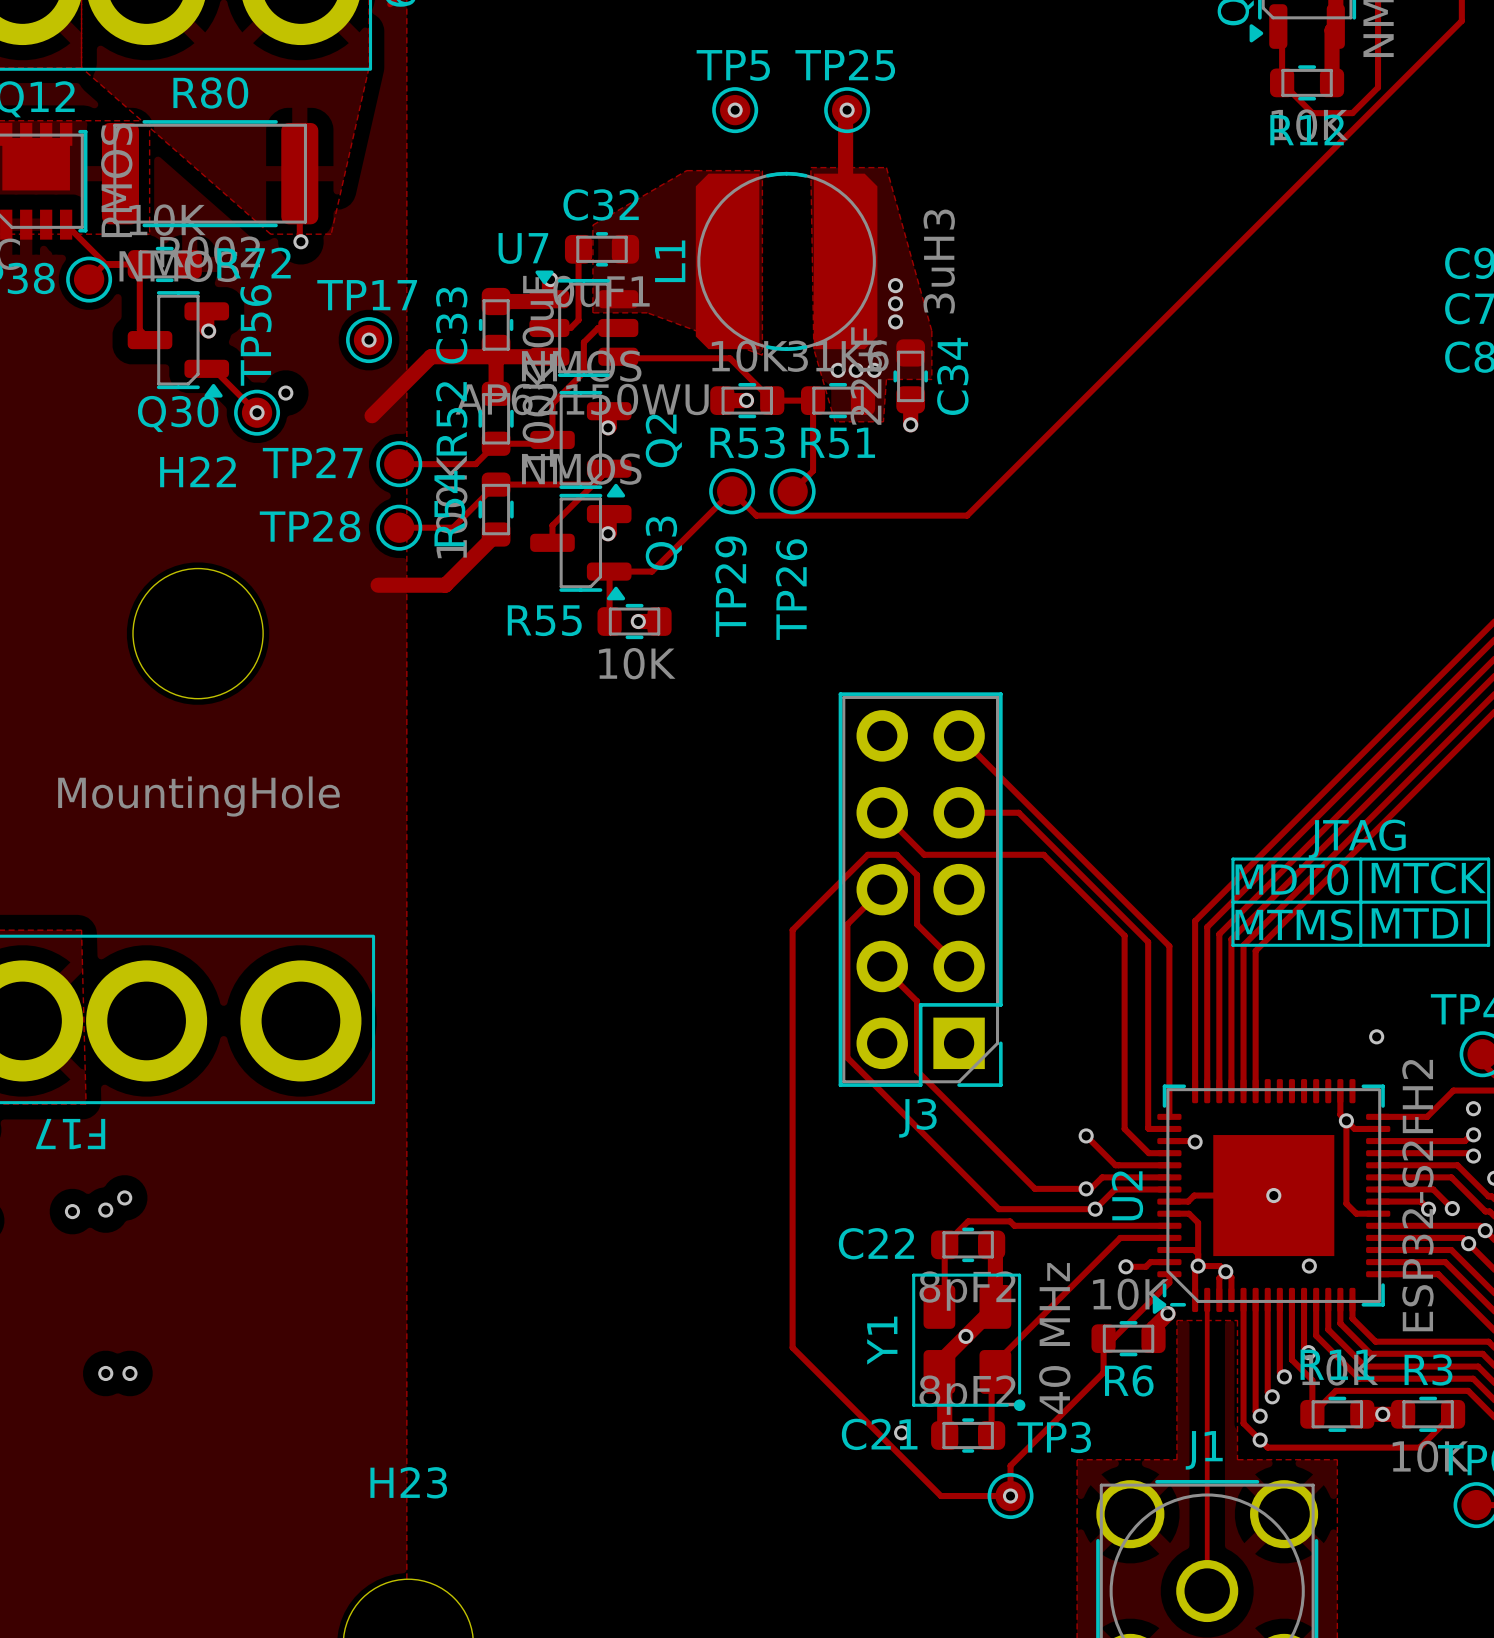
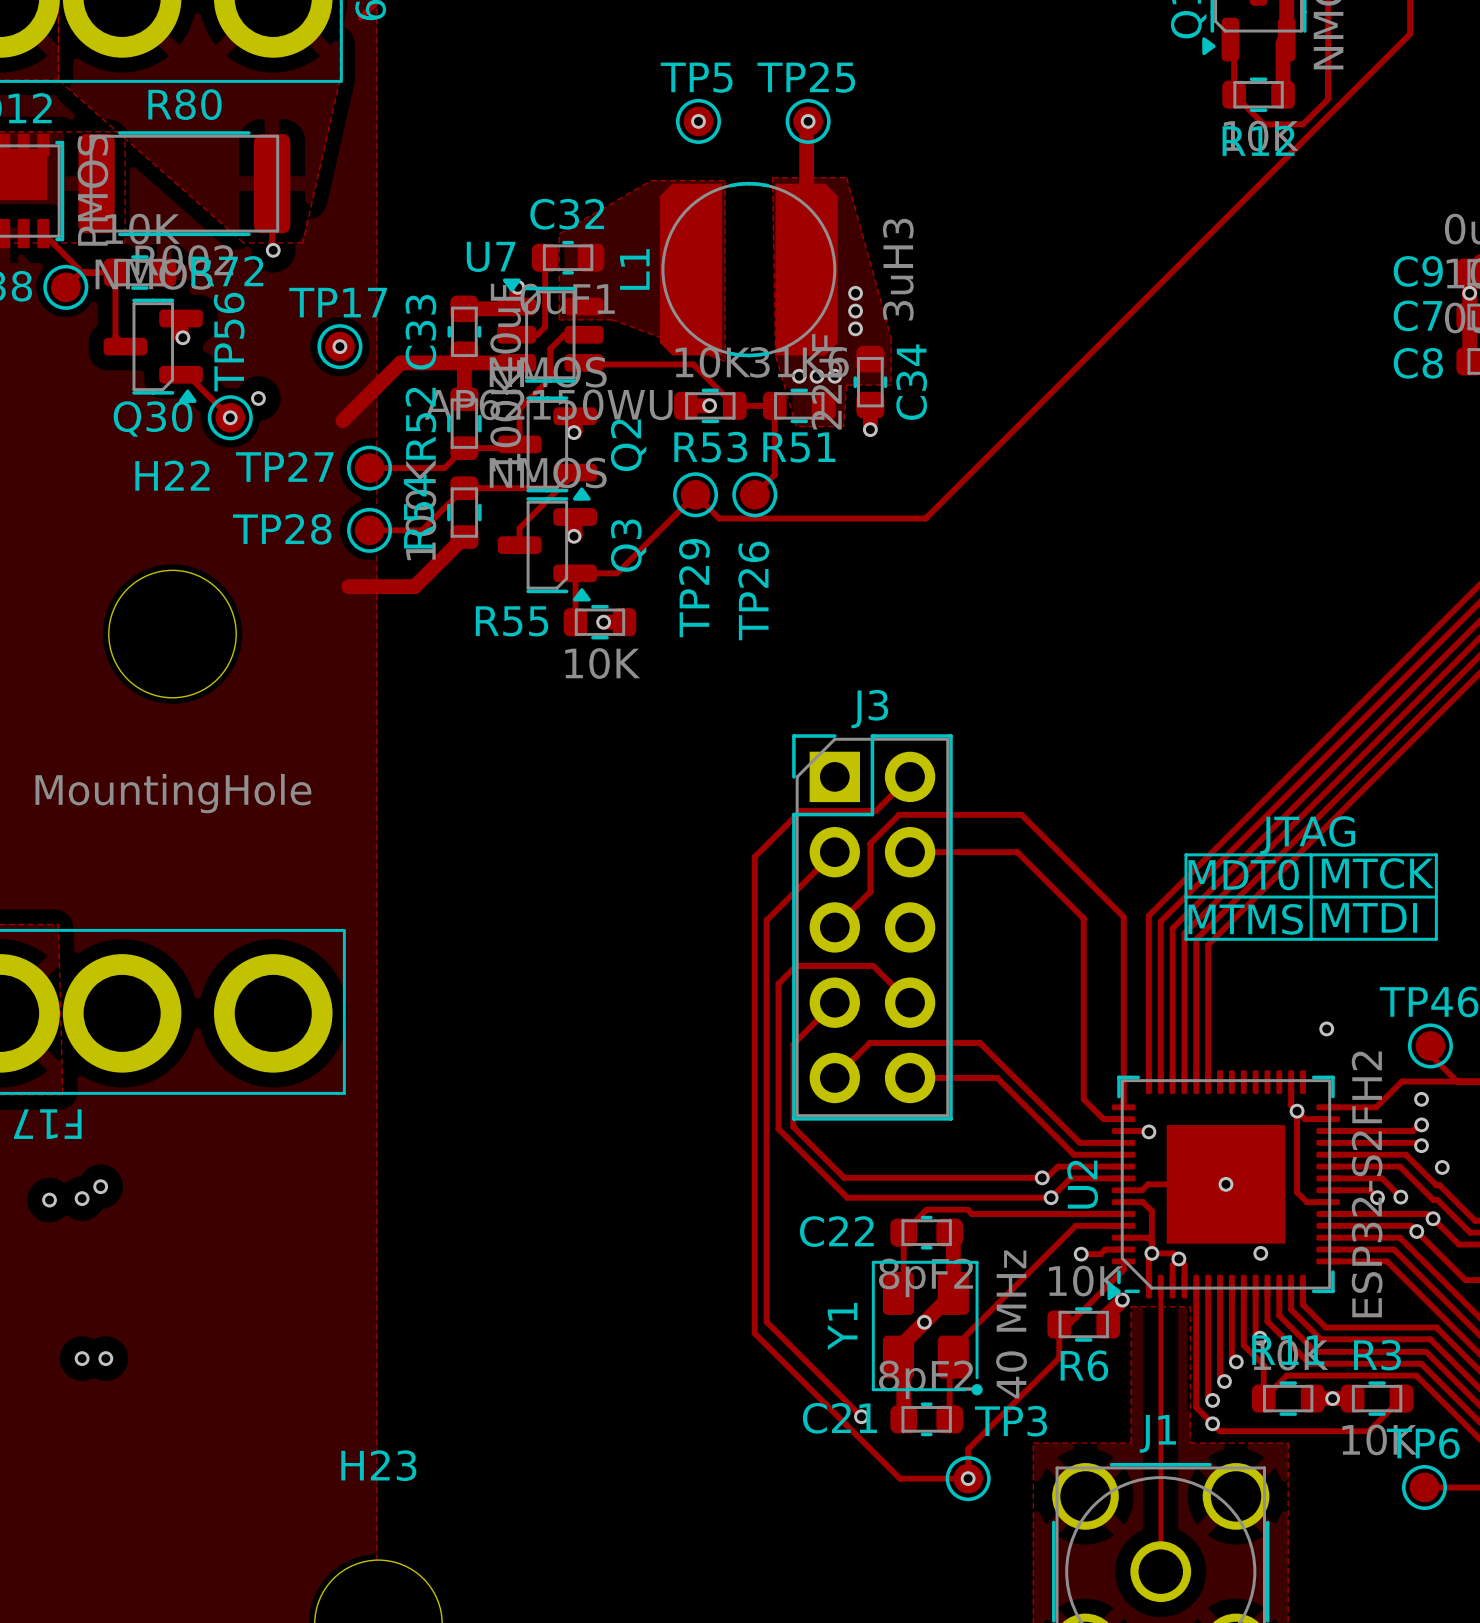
track: (959, 735) (1169, 946) -> (834, 927) (870, 891) (870, 843) (899, 814) (1021, 814) (1123, 917) (1123, 940)
track: (882, 812) (924, 854) (1043, 854) (1124, 935) (1124, 1128) (1148, 1153) -> (834, 1077) (869, 1043) (980, 1043) (1079, 1142) (1103, 1142)
track: (959, 812) (1018, 812) (1148, 942) (1148, 1128) -> (910, 852) (1017, 852) (1083, 918) (1083, 1099) (1102, 1118)
track: none -> (834, 852) (766, 920) (766, 1321) (861, 1416)
track: (882, 889) (847, 924) (847, 1057) (998, 1209) -> (910, 1002) (873, 965) (796, 965) (778, 983) (778, 1128) (847, 1197) (956, 1197)
J3 rotation: 0° (920, 889) -> 180° (872, 927)
track: (792, 929) (867, 854) (896, 854) (917, 875) (917, 924) (959, 966) -> (754, 924) (754, 856) (800, 811) (875, 811) (910, 776)
track: (882, 966) (917, 1001) (917, 1070) (1034, 1188) -> (834, 1002) (793, 1044) (793, 1126) (844, 1177) (992, 1177)
track: (1086, 1135) (1115, 1165) (1118, 1165) -> (910, 1077) (997, 1077) (1073, 1154)
via: (1086, 1135) -> none

